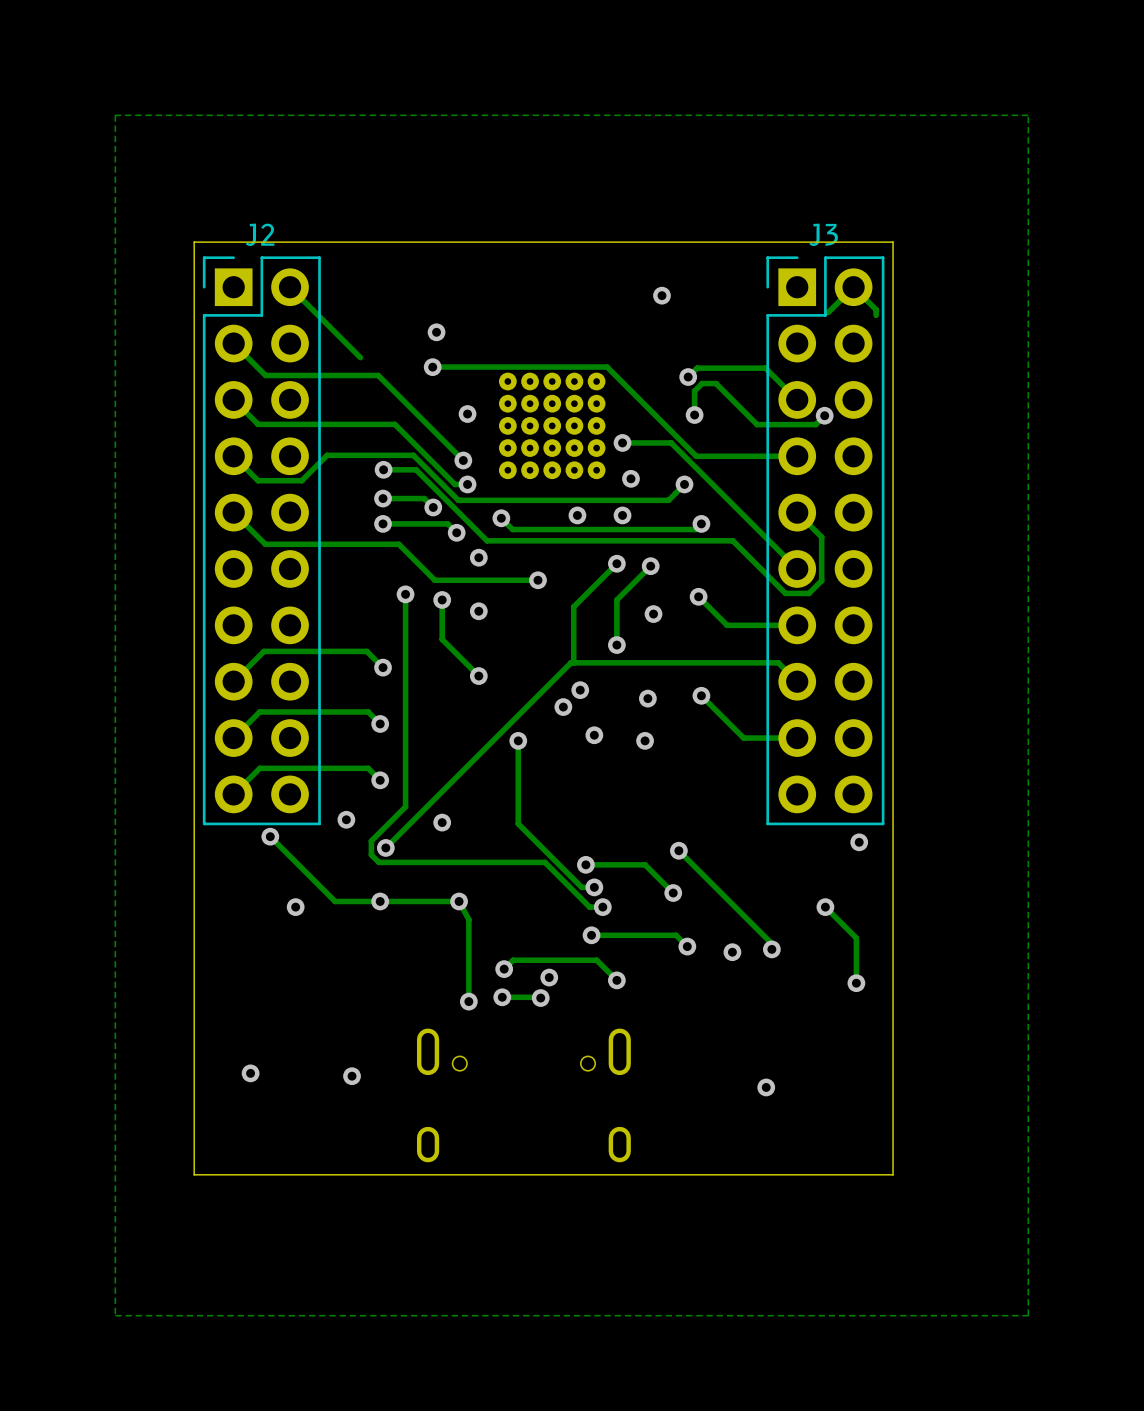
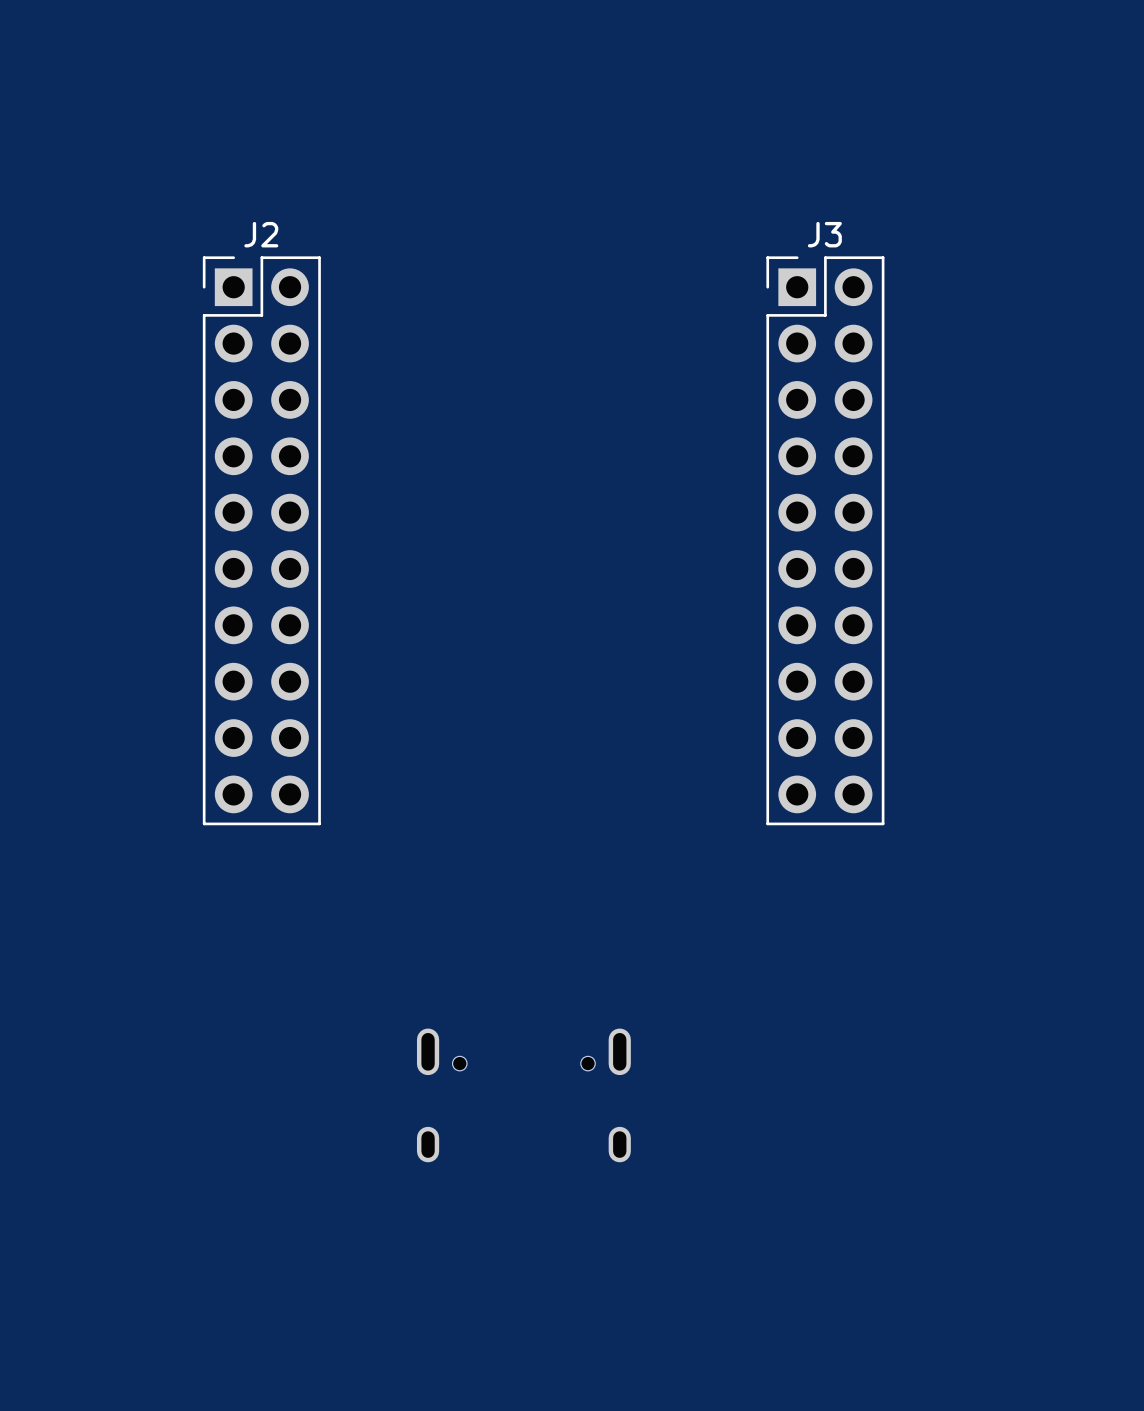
zone outline: (1028, 115) (1028, 1315) (115, 1315) (115, 115) (1028, 115) -> none
board edge: (893, 242) (893, 1174) (194, 1174) (194, 242) (893, 242) -> none
track: (290, 287) (360, 357) -> none
via: (661, 295) -> none
track: (828, 312) (853, 287) (876, 309) (876, 315) -> none
via: (436, 332) -> none
track: (233, 343) (265, 375) (378, 375) (463, 460) -> none
track: (432, 367) (607, 367) (696, 456) (797, 456) -> none
via: (432, 367) -> none
track: (688, 377) (697, 368) (765, 368) (797, 399) -> none
via: (688, 377) -> none
track: (233, 399) (258, 424) (394, 424) (455, 484) (467, 484) -> none
via: (467, 414) -> none
track: (694, 415) (694, 391) (702, 383) (716, 383) (757, 424) (815, 424) (824, 415) -> none
via: (694, 415) -> none
via: (824, 415) -> none
part: (552, 425) -> none
track: (622, 442) (671, 442) (797, 568) -> none
via: (622, 442) -> none
track: (233, 456) (258, 480) (301, 480) (327, 455) (413, 455) (458, 500) (668, 500) (684, 484) -> none
via: (463, 460) -> none
track: (383, 469) (416, 469) (487, 540) (732, 540) (785, 593) (808, 593) (821, 580) (821, 537) (797, 512) -> none
via: (383, 469) -> none
via: (630, 478) -> none
via: (467, 484) -> none
via: (684, 484) -> none
track: (383, 498) (424, 498) (433, 507) -> none
via: (383, 498) -> none
via: (433, 507) -> none
track: (233, 512) (265, 544) (398, 544) (434, 580) (537, 580) -> none
via: (577, 515) -> none
via: (622, 515) -> none
track: (501, 518) (512, 529) (695, 529) (701, 523) -> none
via: (501, 518) -> none
track: (383, 523) (447, 523) (456, 532) -> none
via: (383, 523) -> none
via: (701, 523) -> none
via: (456, 532) -> none
via: (478, 557) -> none
track: (616, 563) (573, 606) (573, 662) -> none
via: (616, 563) -> none
track: (650, 566) (616, 599) (616, 645) -> none
via: (650, 566) -> none
via: (537, 580) -> none
track: (405, 594) (405, 806) (371, 841) (371, 854) (378, 862) (544, 862) (589, 907) (602, 907) -> none
via: (405, 594) -> none
track: (698, 596) (727, 625) (797, 625) -> none
via: (698, 596) -> none
track: (442, 599) (442, 639) (478, 676) -> none
via: (442, 599) -> none
via: (478, 611) -> none
via: (653, 614) -> none
via: (616, 645) -> none
track: (383, 667) (366, 651) (263, 651) (233, 681) -> none
via: (383, 667) -> none
via: (478, 676) -> none
track: (797, 681) (778, 662) (570, 662) (385, 847) -> none
via: (580, 690) -> none
track: (701, 695) (743, 738) (797, 738) -> none
via: (701, 695) -> none
via: (647, 698) -> none
via: (563, 707) -> none
track: (380, 723) (368, 711) (259, 711) (233, 738) -> none
via: (380, 723) -> none
via: (594, 735) -> none
track: (518, 740) (518, 823) (581, 887) (594, 887) -> none
via: (518, 740) -> none
via: (645, 740) -> none
track: (380, 780) (368, 768) (259, 768) (233, 794) -> none
via: (380, 780) -> none
via: (346, 819) -> none
via: (442, 822) -> none
track: (270, 836) (335, 901) (459, 901) (468, 919) (468, 1001) -> none
via: (270, 836) -> none
via: (859, 842) -> none
via: (385, 847) -> none
track: (678, 850) (771, 943) (771, 949) -> none
via: (678, 850) -> none
track: (585, 864) (645, 864) (673, 893) -> none
via: (585, 864) -> none
via: (594, 887) -> none
via: (673, 893) -> none
via: (380, 901) -> none
via: (459, 901) -> none
via: (295, 907) -> none
via: (602, 907) -> none
track: (825, 907) (856, 938) (856, 983) -> none
via: (825, 907) -> none
track: (591, 935) (676, 935) (687, 946) -> none
via: (591, 935) -> none
via: (687, 946) -> none
via: (771, 949) -> none
via: (732, 952) -> none
track: (504, 969) (513, 960) (596, 960) (616, 980) -> none
via: (504, 969) -> none
via: (549, 977) -> none
via: (616, 980) -> none
via: (856, 983) -> none
track: (502, 997) (540, 998) -> none
via: (502, 997) -> none
via: (540, 998) -> none
via: (468, 1001) -> none
via: (250, 1073) -> none
via: (352, 1076) -> none
via: (766, 1087) -> none

